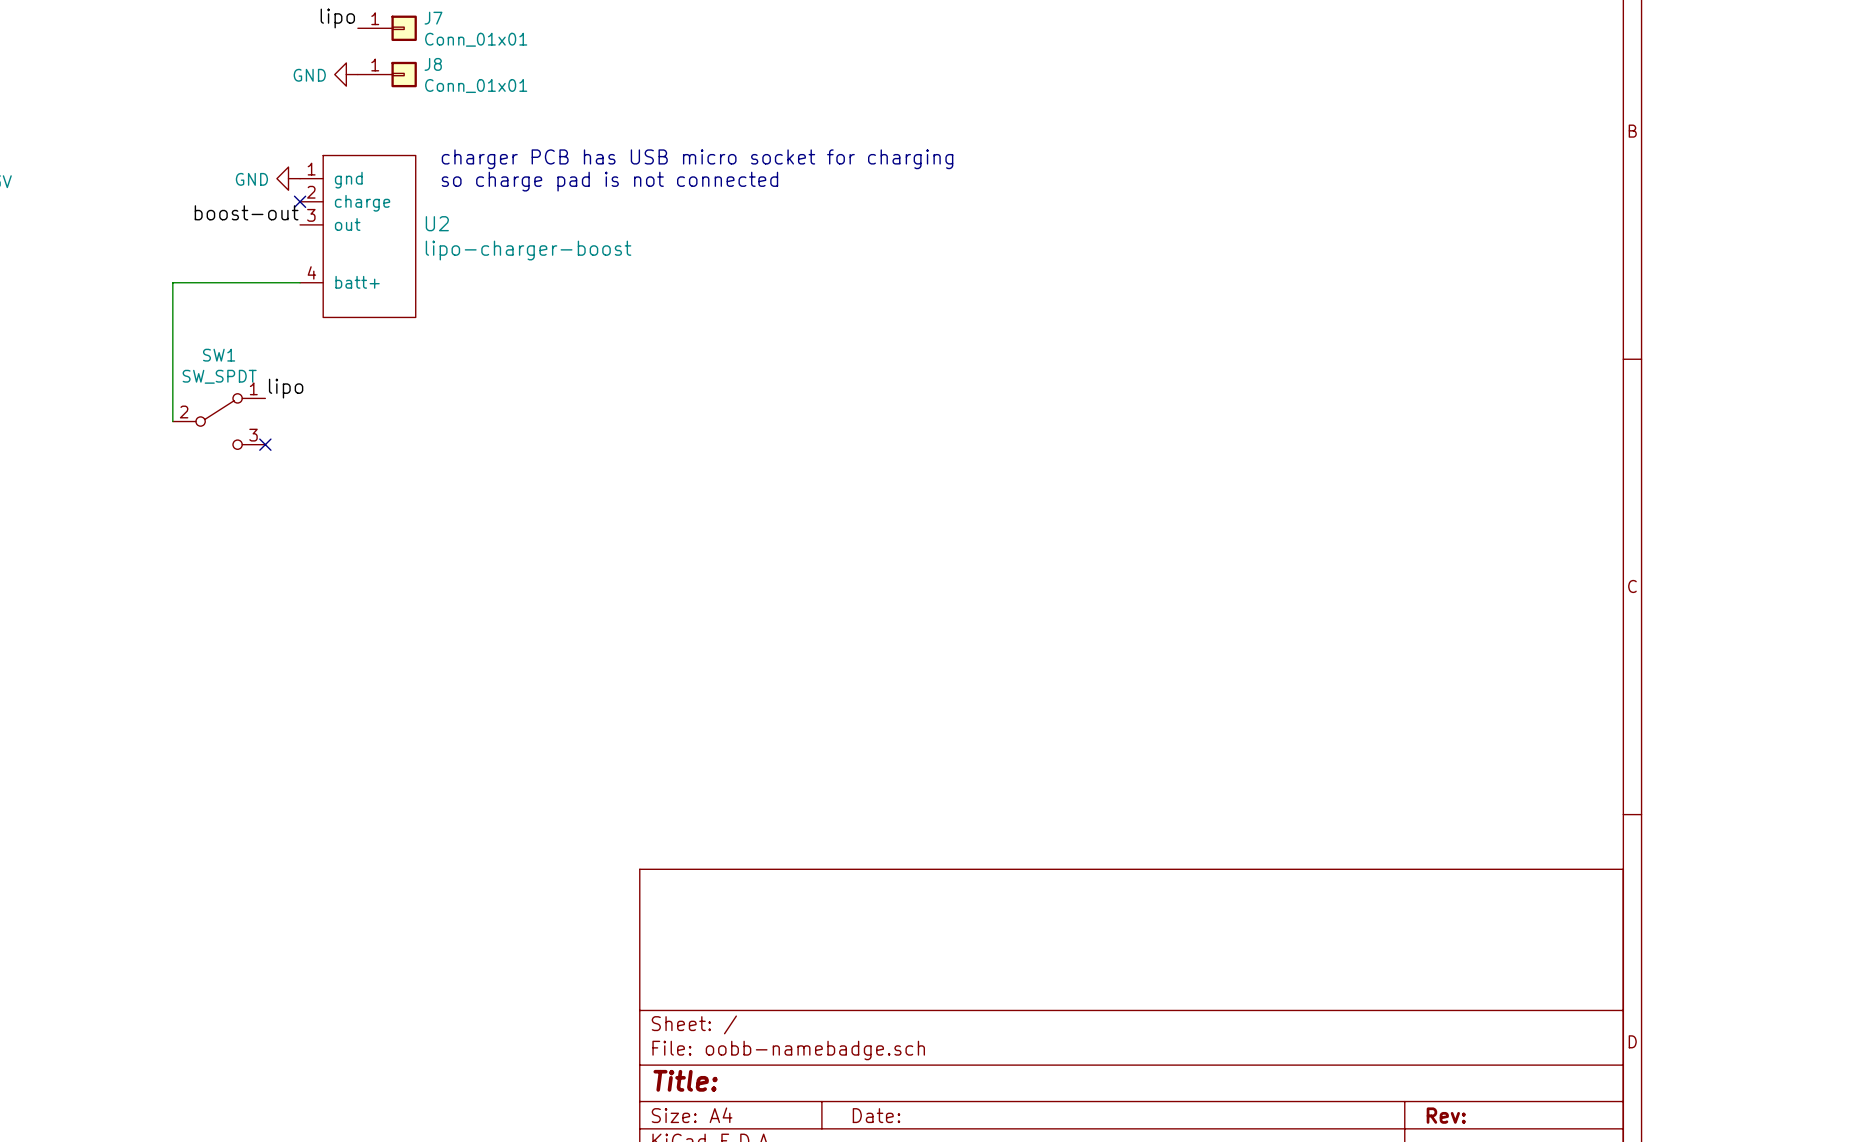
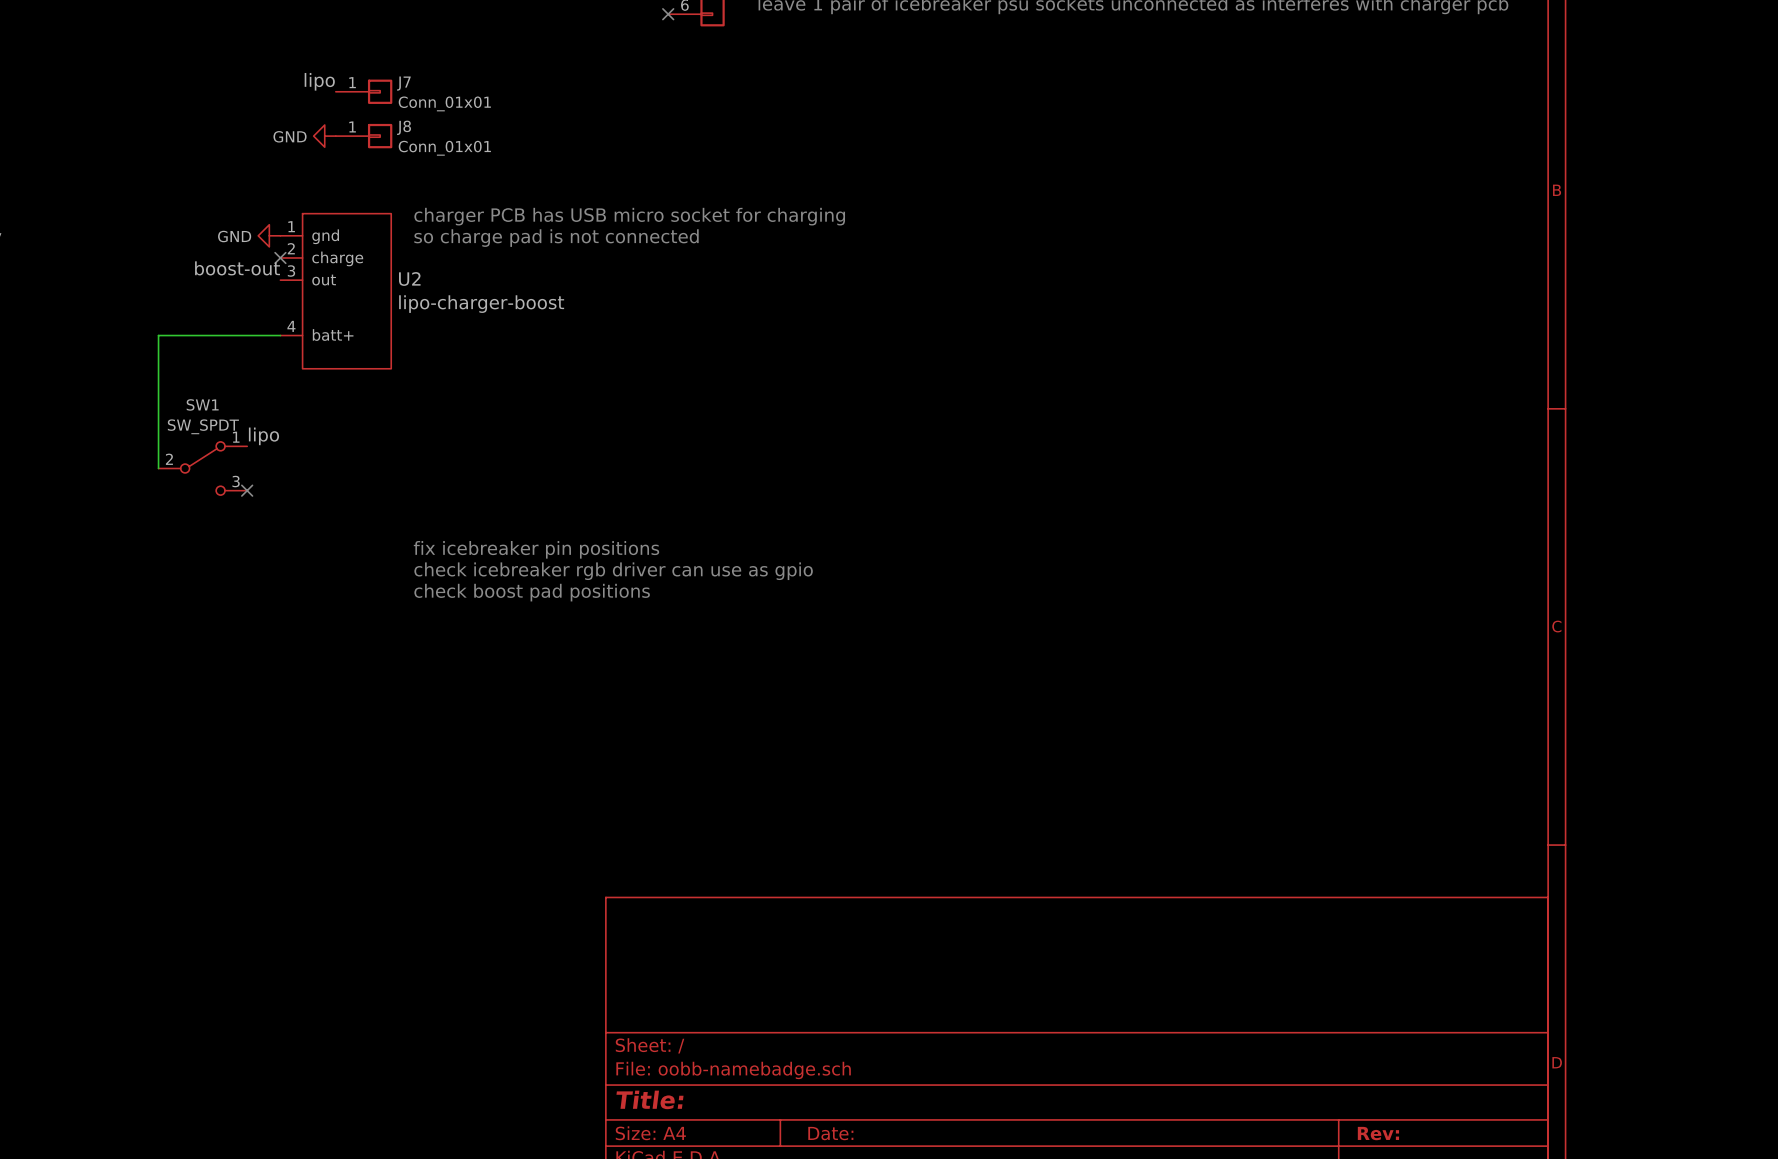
text: none -> fix icebreaker pin positions (536, 549)
text: none -> check icebreaker rgb driver can use as gpio (613, 571)
text: none -> check boost pad positions (532, 592)

